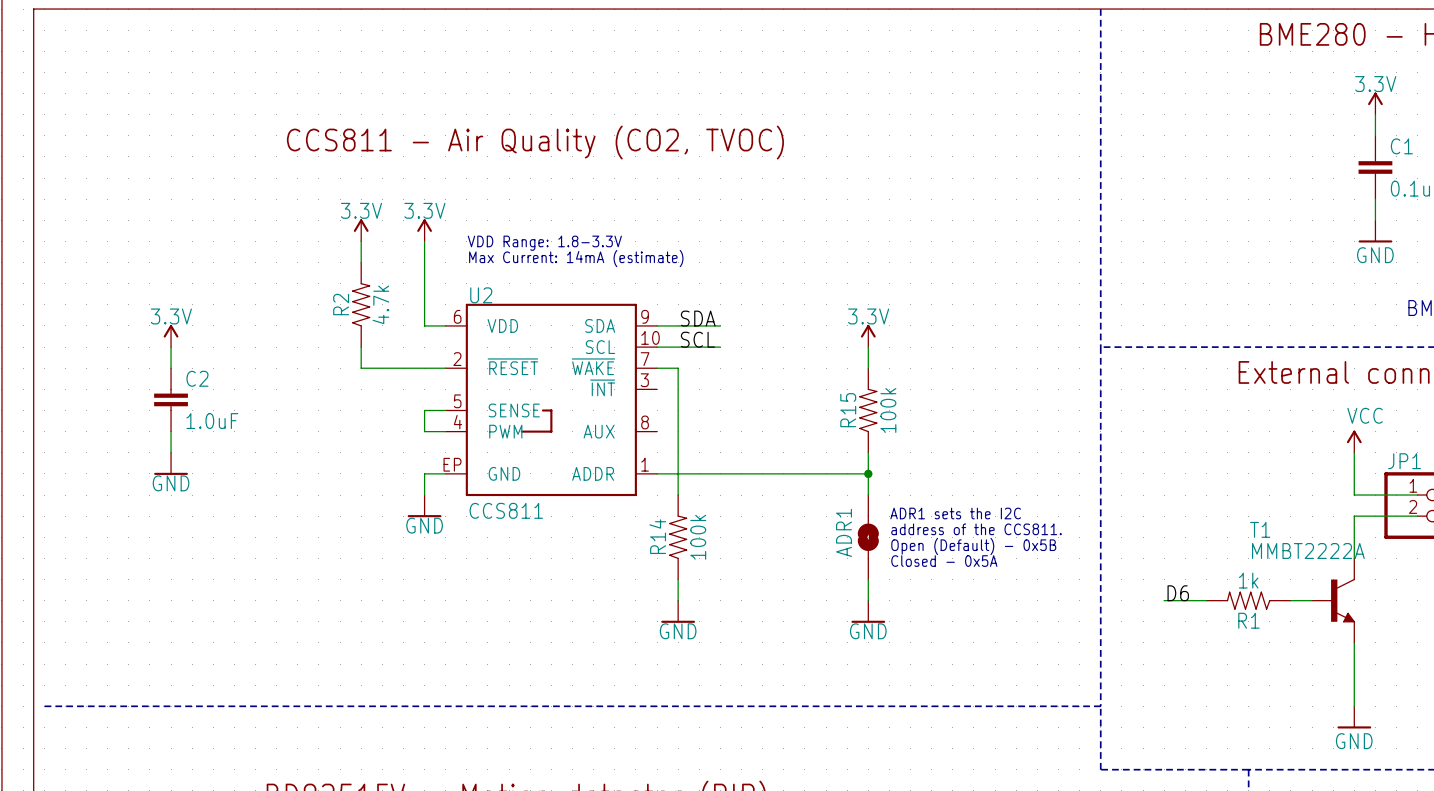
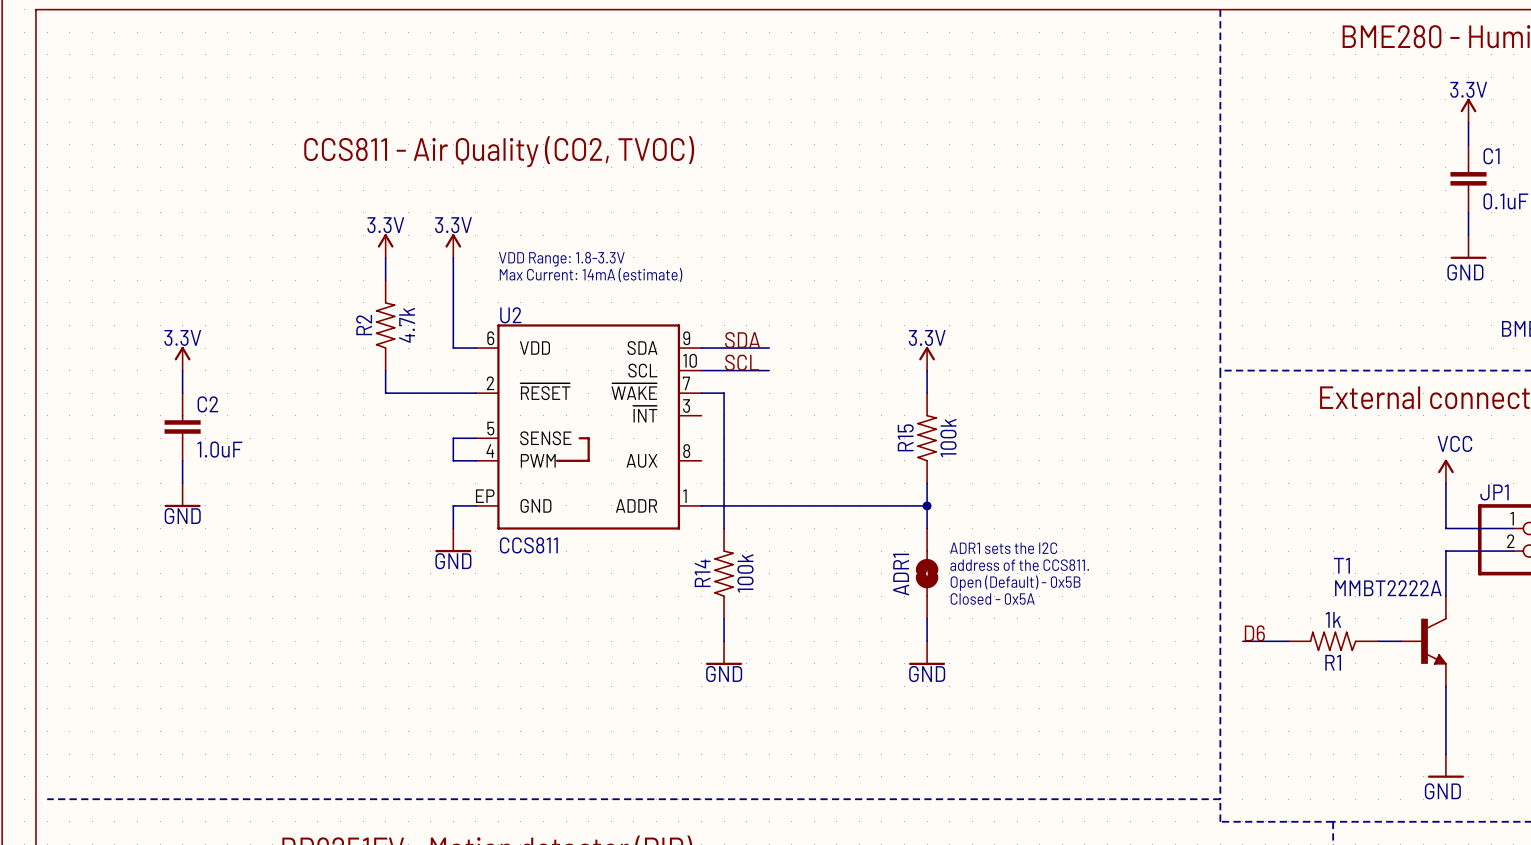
line: (1100, 9) (1100, 769) (1143, 769) -> (1220, 9) (1220, 821)
line: (1100, 347) (1143, 347) -> none
line: (44, 706) (1100, 706) -> none
line: none -> (47, 799) (1220, 799)

